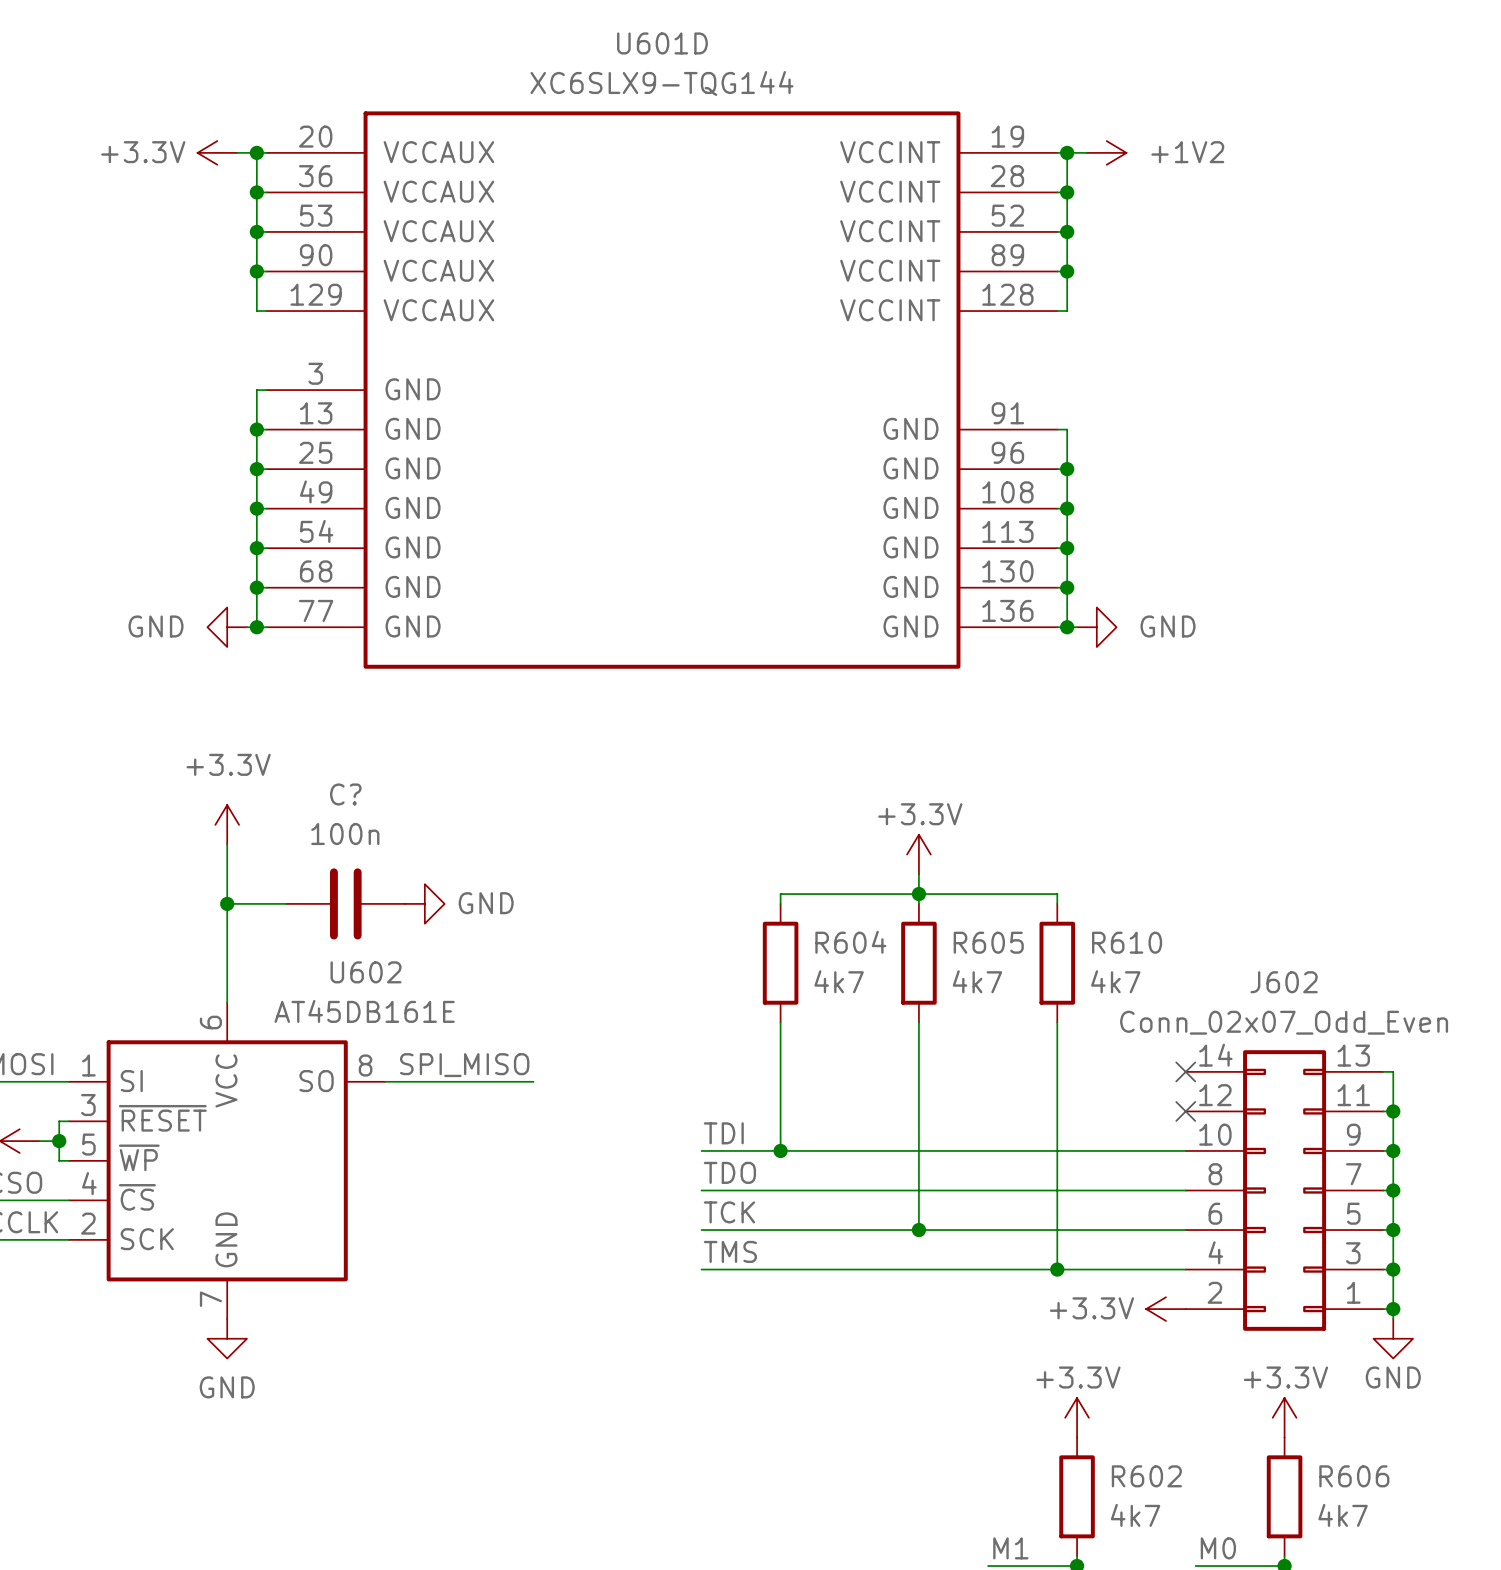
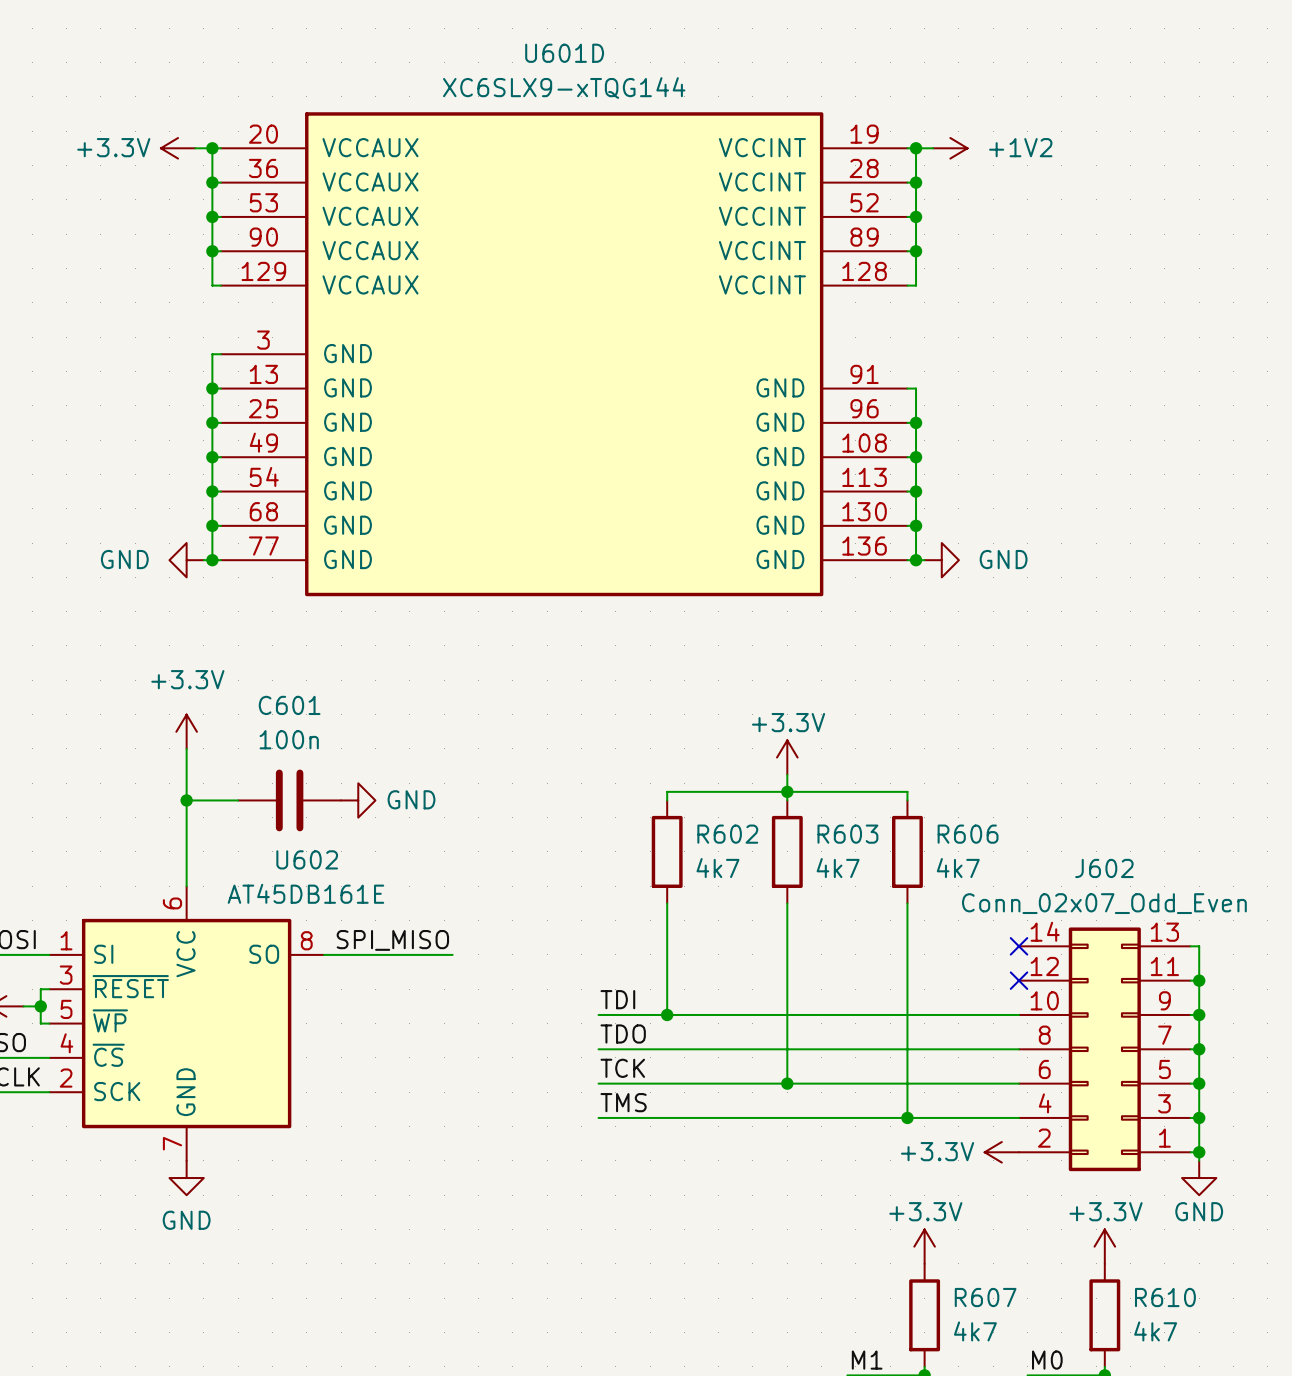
U601D value: XC6SLX9-TQG144 (662, 83) -> XC6SLX9-xTQG144 (564, 87)
C? name: C? (345, 794) -> C601 (289, 705)
R604 name: R604 (850, 942) -> R602 (727, 834)
R605 name: R605 (988, 942) -> R603 (847, 834)
R610 name: R610 (1127, 942) -> R606 (968, 834)
R602 name: R602 (1146, 1476) -> R607 (985, 1297)
R606 name: R606 (1354, 1476) -> R610 (1165, 1297)

